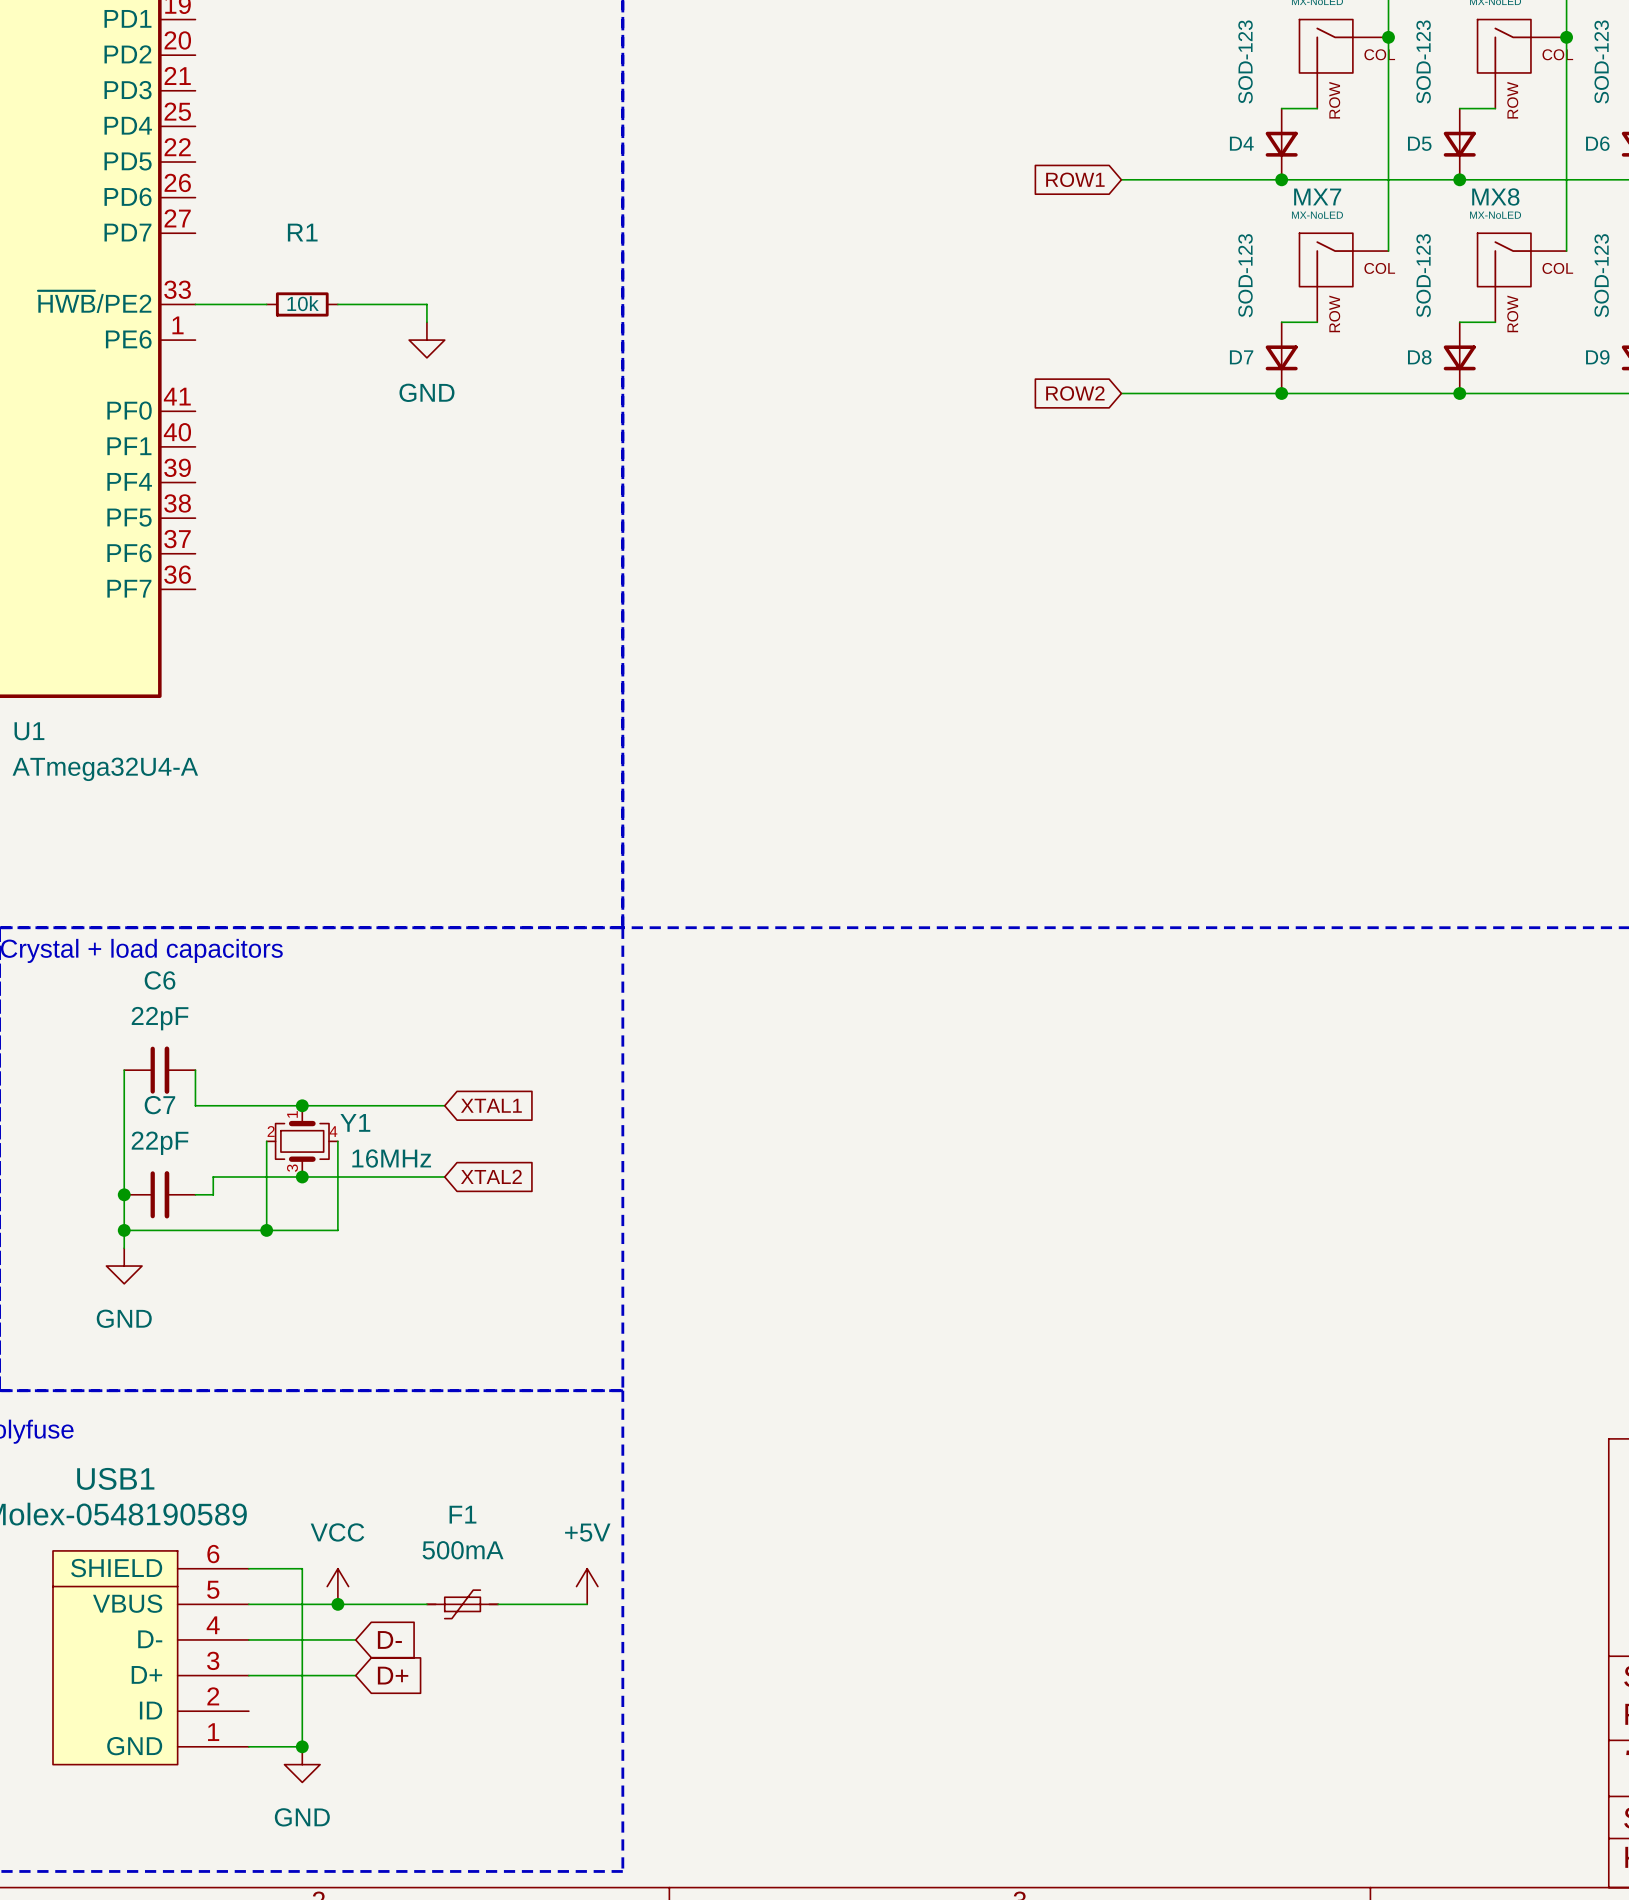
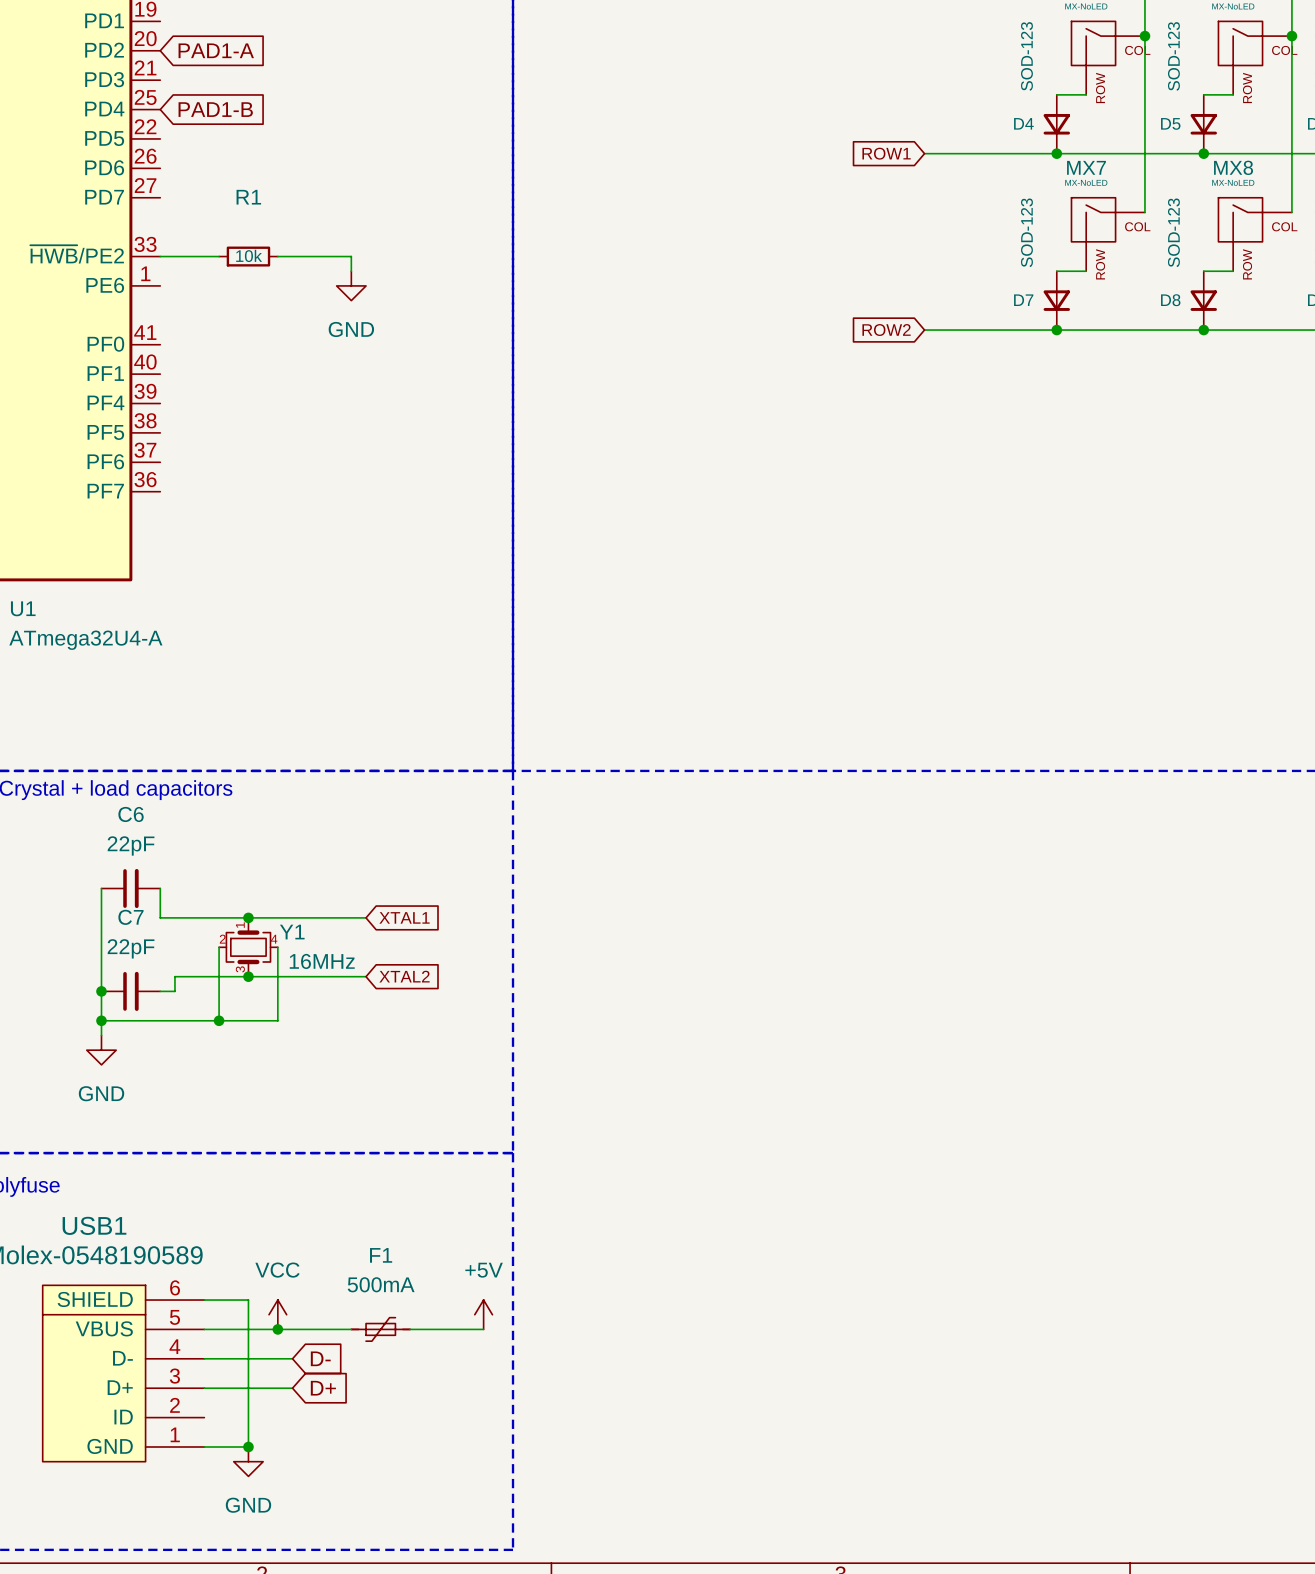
global label: none -> PAD1-A (216, 50)
global label: none -> PAD1-B (215, 109)

